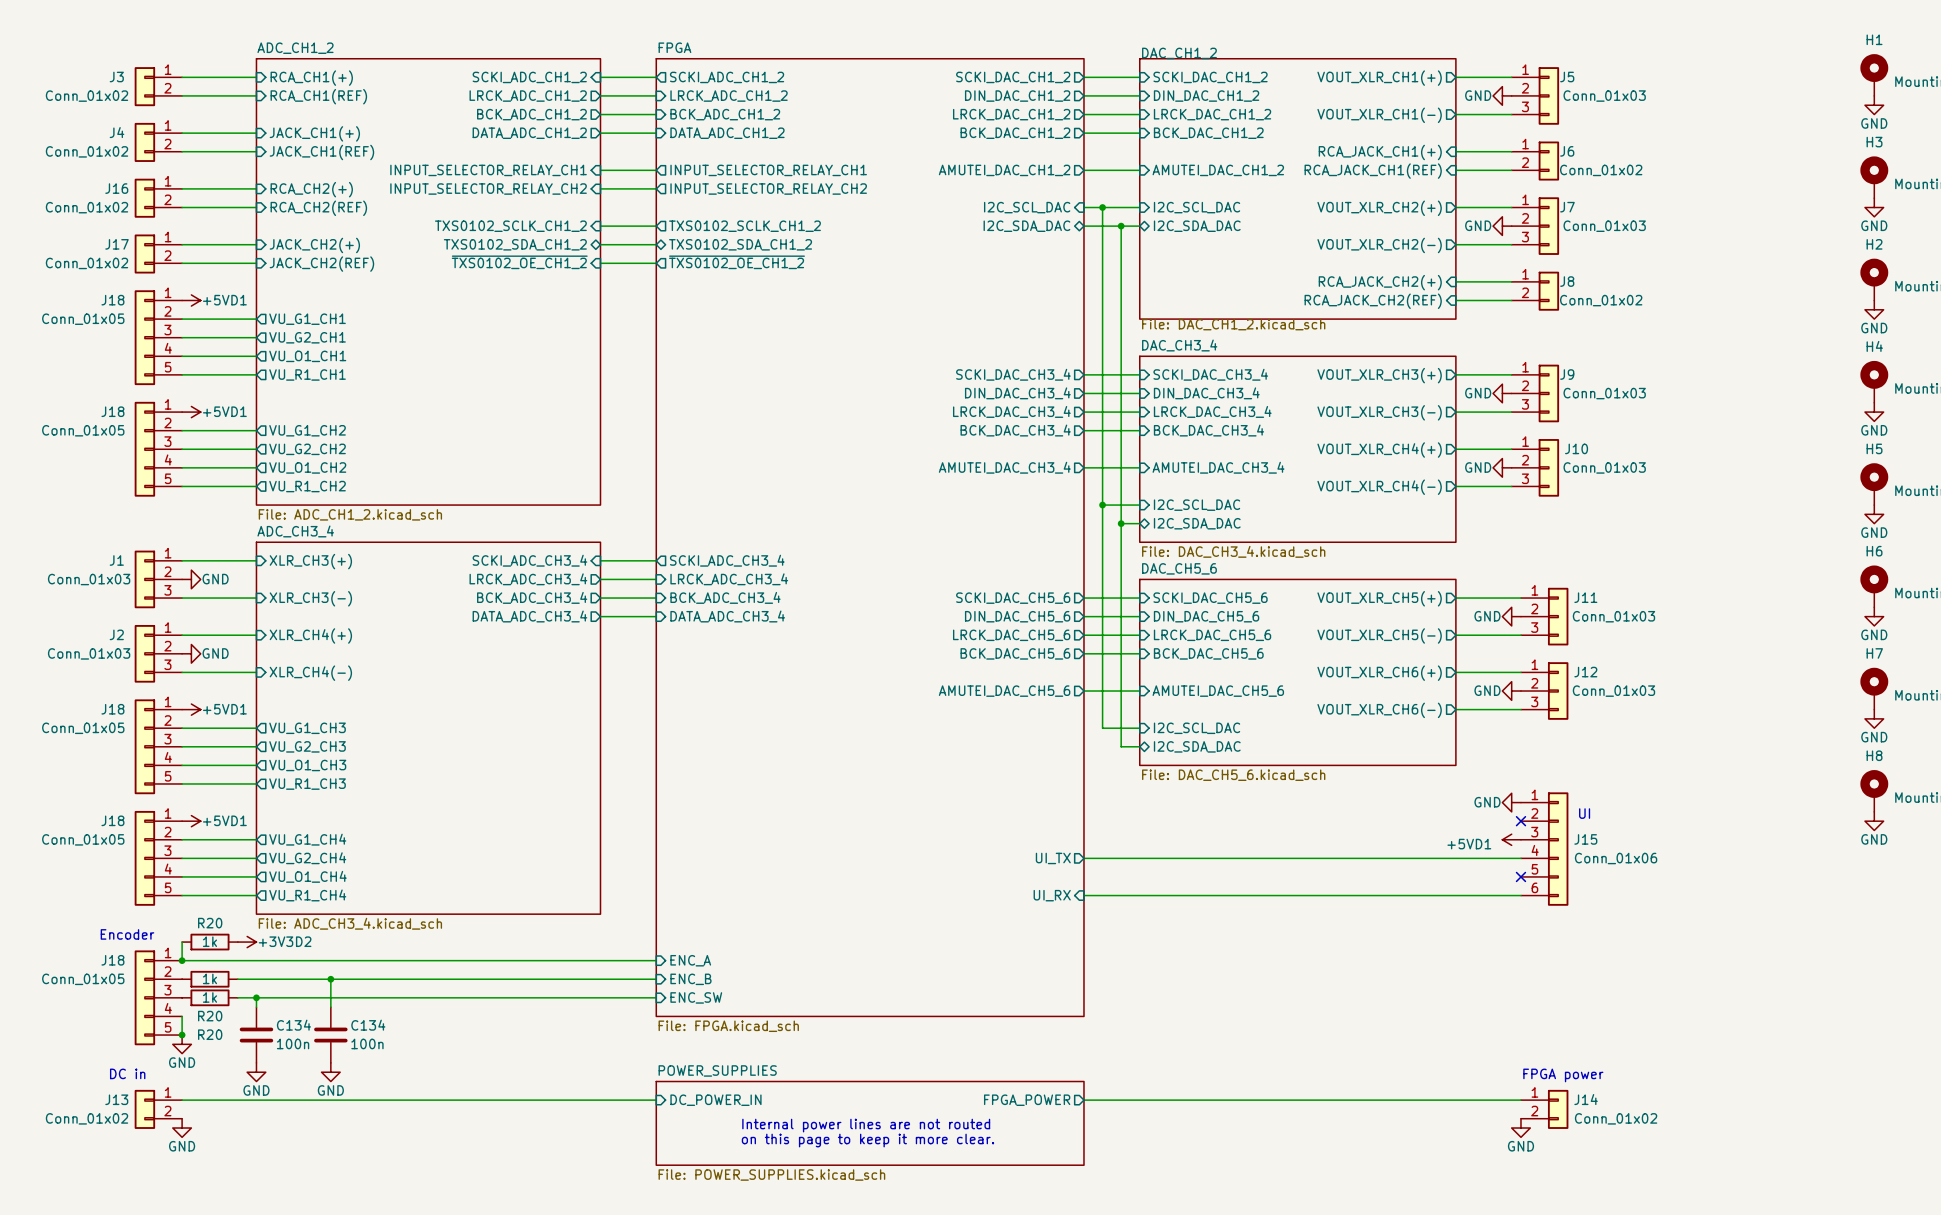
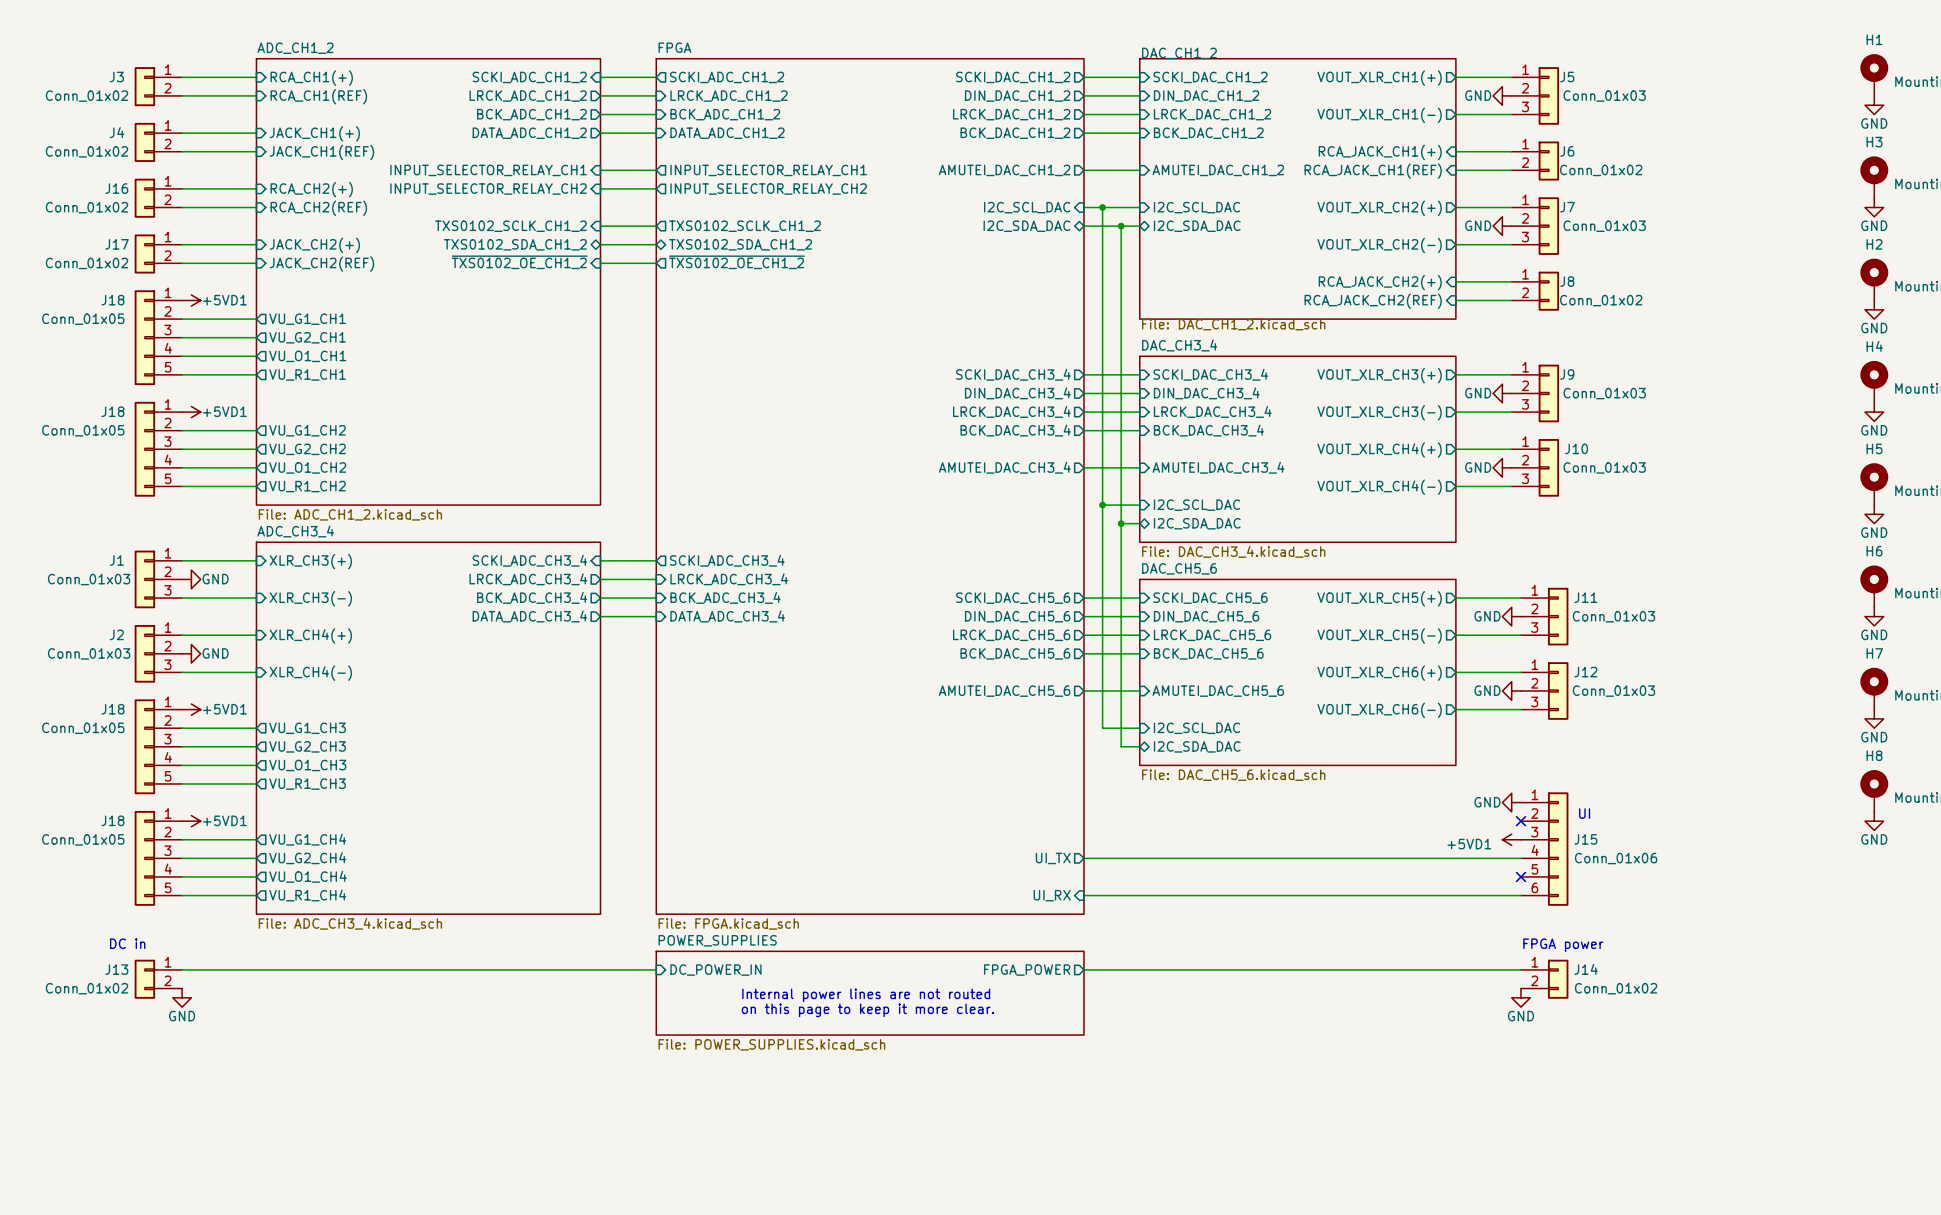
sheet FPGA: none -> File: FPGA.kicad_sch (870, 486)
sheet FPGA: File: FPGA.kicad_sch (870, 537) -> none
text: Encoder (127, 934) -> none
wire: (182, 942) (182, 960) (656, 960) -> none
R20: 1k (209, 942) -> none
power symbol: +3V3D2 (247, 942) -> none
junction: (182, 960) -> none
sheet pin: ENC_A (690, 960) -> none
R20: 1k (209, 979) -> none
wire: (237, 979) (656, 979) -> none
wire: (330, 979) (330, 1007) -> none
junction: (330, 979) -> none
sheet pin: ENC_B (690, 979) -> none
J18: Conn_01x05 (158, 997) -> none
R20: 1k (209, 997) -> none
wire: (237, 997) (656, 997) -> none
wire: (256, 997) (256, 1007) -> none
junction: (256, 997) -> none
sheet pin: ENC_SW (696, 997) -> none
wire: (182, 1016) (182, 1035) -> none
junction: (182, 1035) -> none
C134: 100n (256, 1035) -> none
C134: 100n (330, 1035) -> none
power symbol position: GND (182, 1044) -> GND (182, 997)
power symbol: GND (256, 1072) -> none
power symbol: GND (330, 1072) -> none
text position: DC in (127, 1073) -> DC in (127, 943)
text position: FPGA power (1563, 1075) -> FPGA power (1563, 945)
wire: (182, 1100) (656, 1100) -> (182, 969) (656, 969)
sheet pin position: DC_POWER_IN (715, 1100) -> DC_POWER_IN (715, 970)
sheet pin position: FPGA_POWER (1027, 1100) -> FPGA_POWER (1027, 970)
wire: (1083, 1100) (1520, 1100) -> (1083, 969) (1520, 969)
J13 position: (158, 1109) -> (158, 979)
J14 position: (1544, 1109) -> (1544, 979)
sheet POWER_SUPPLIES position: (870, 1123) -> (870, 993)
text position: Internal power lines are not routed (866, 1125) -> Internal power lines are not routed (866, 995)
power symbol: GND (182, 1128) -> none
power symbol position: GND (1520, 1128) -> GND (1520, 997)
text position: on this page to keep it more clear. (867, 1140) -> on this page to keep it more clear. (867, 1010)

